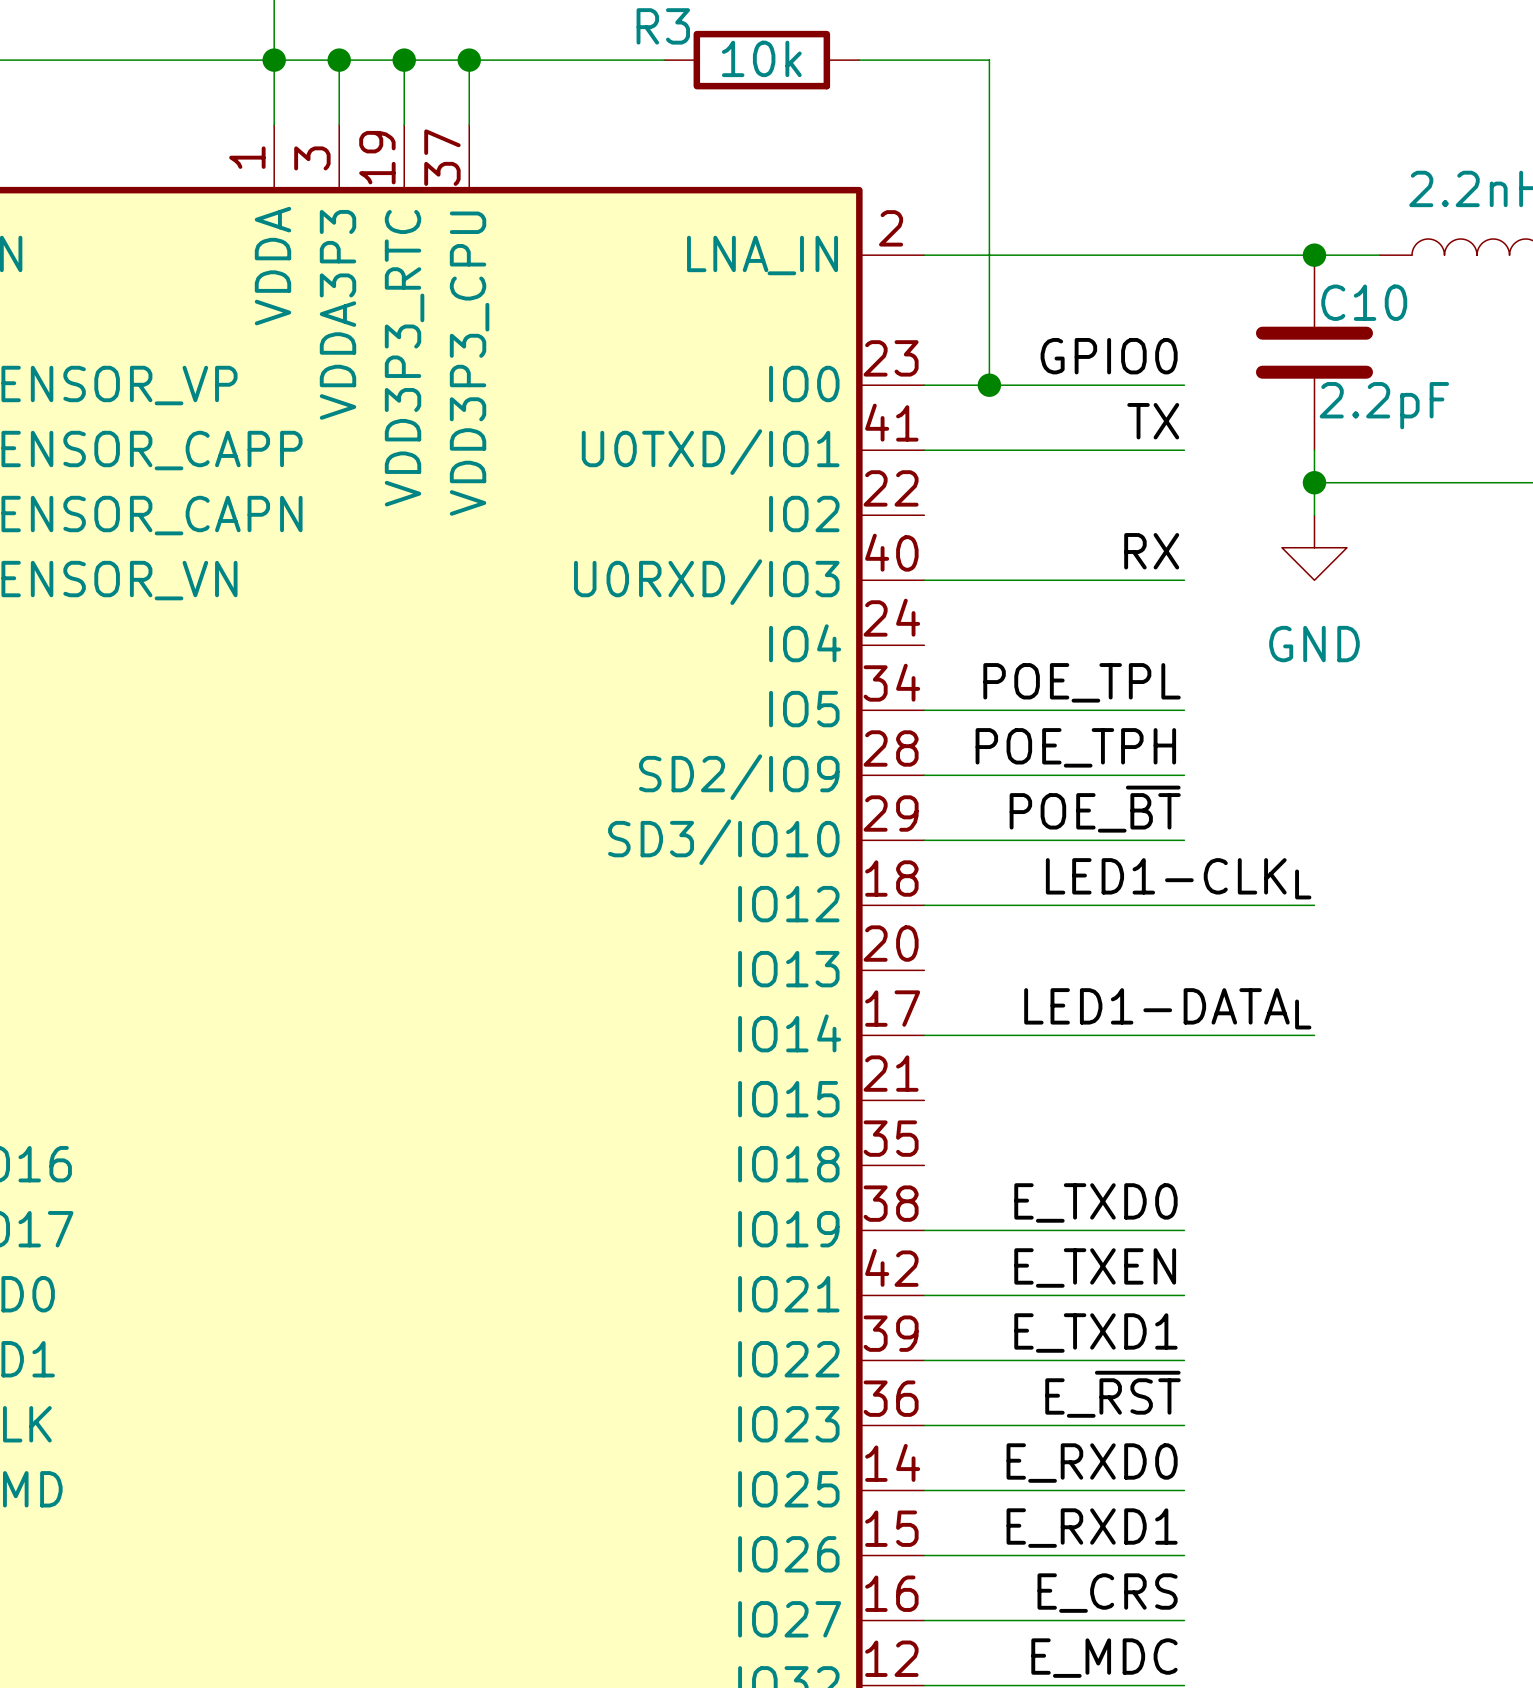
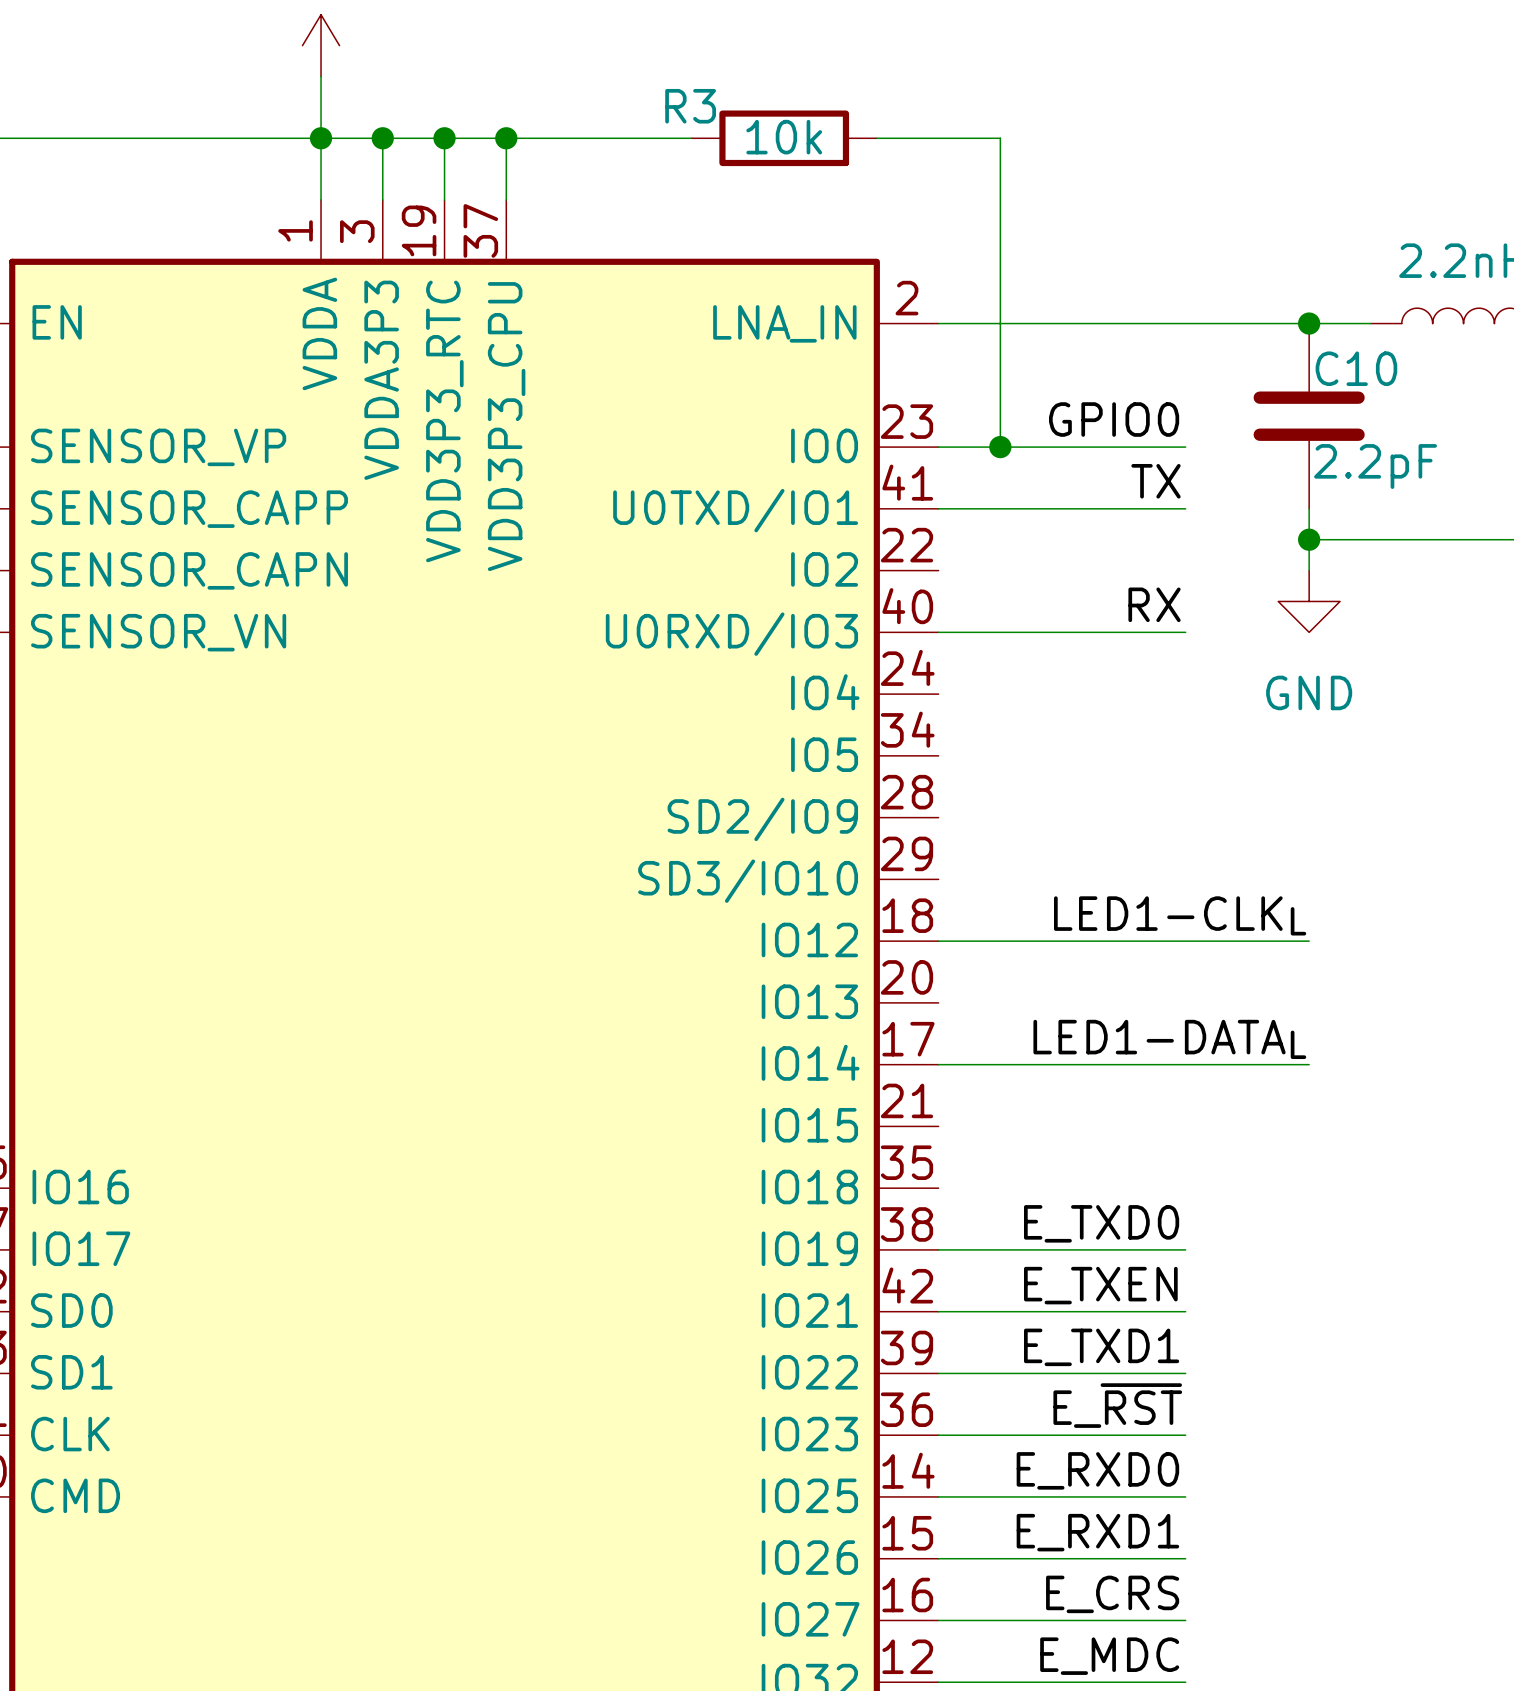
label: POE_TPL (1082, 682) -> none
wire: (924, 710) (1184, 710) -> none
label: POE_TPH (1075, 747) -> none
wire: (924, 775) (1184, 775) -> none
label: POE_~{BT} (1095, 809) -> none
wire: (924, 840) (1184, 840) -> none

